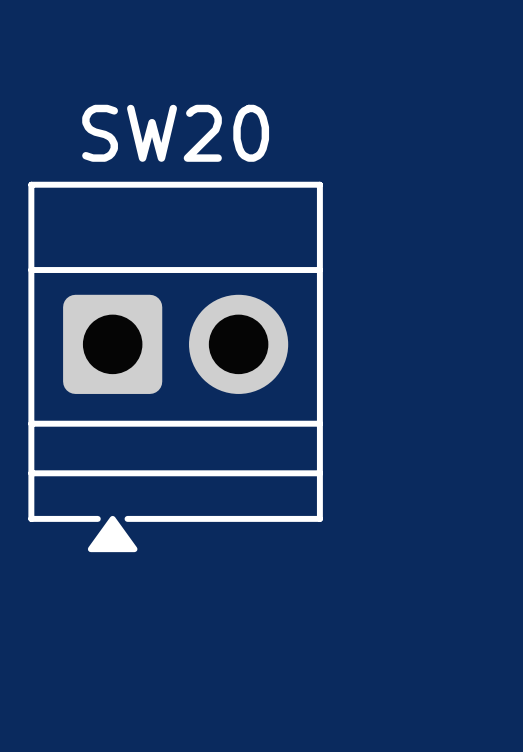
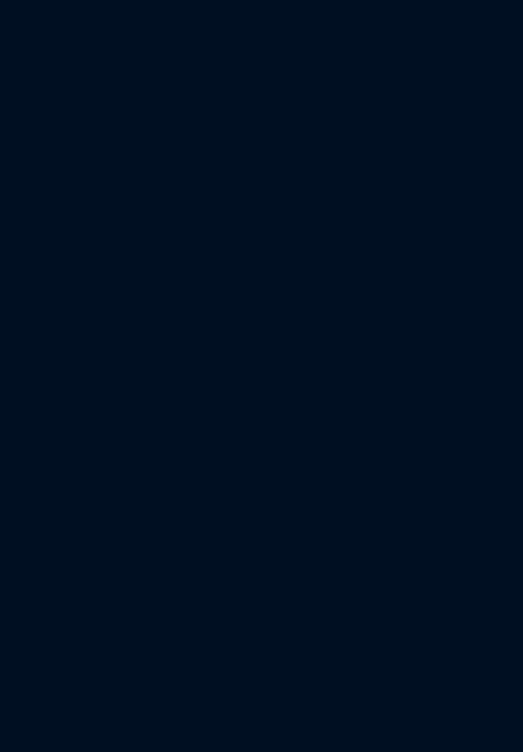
SW20: (175, 366) -> none

